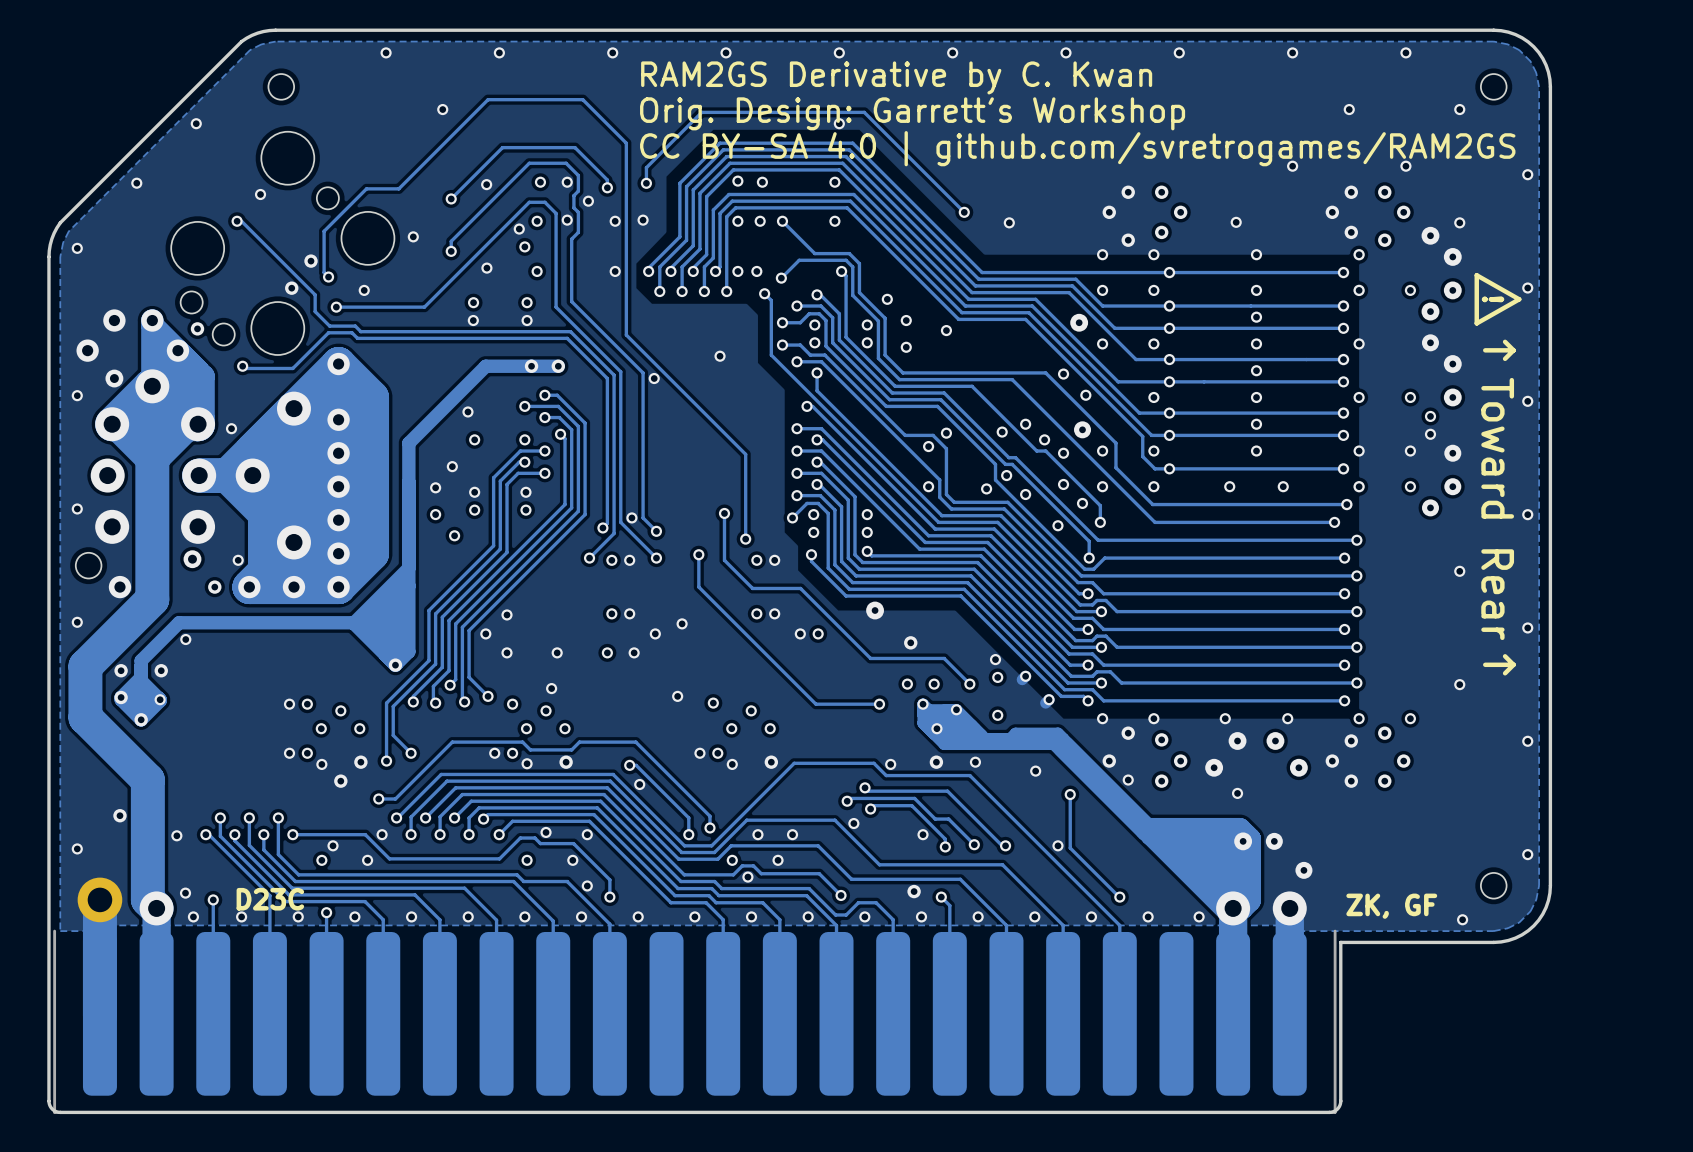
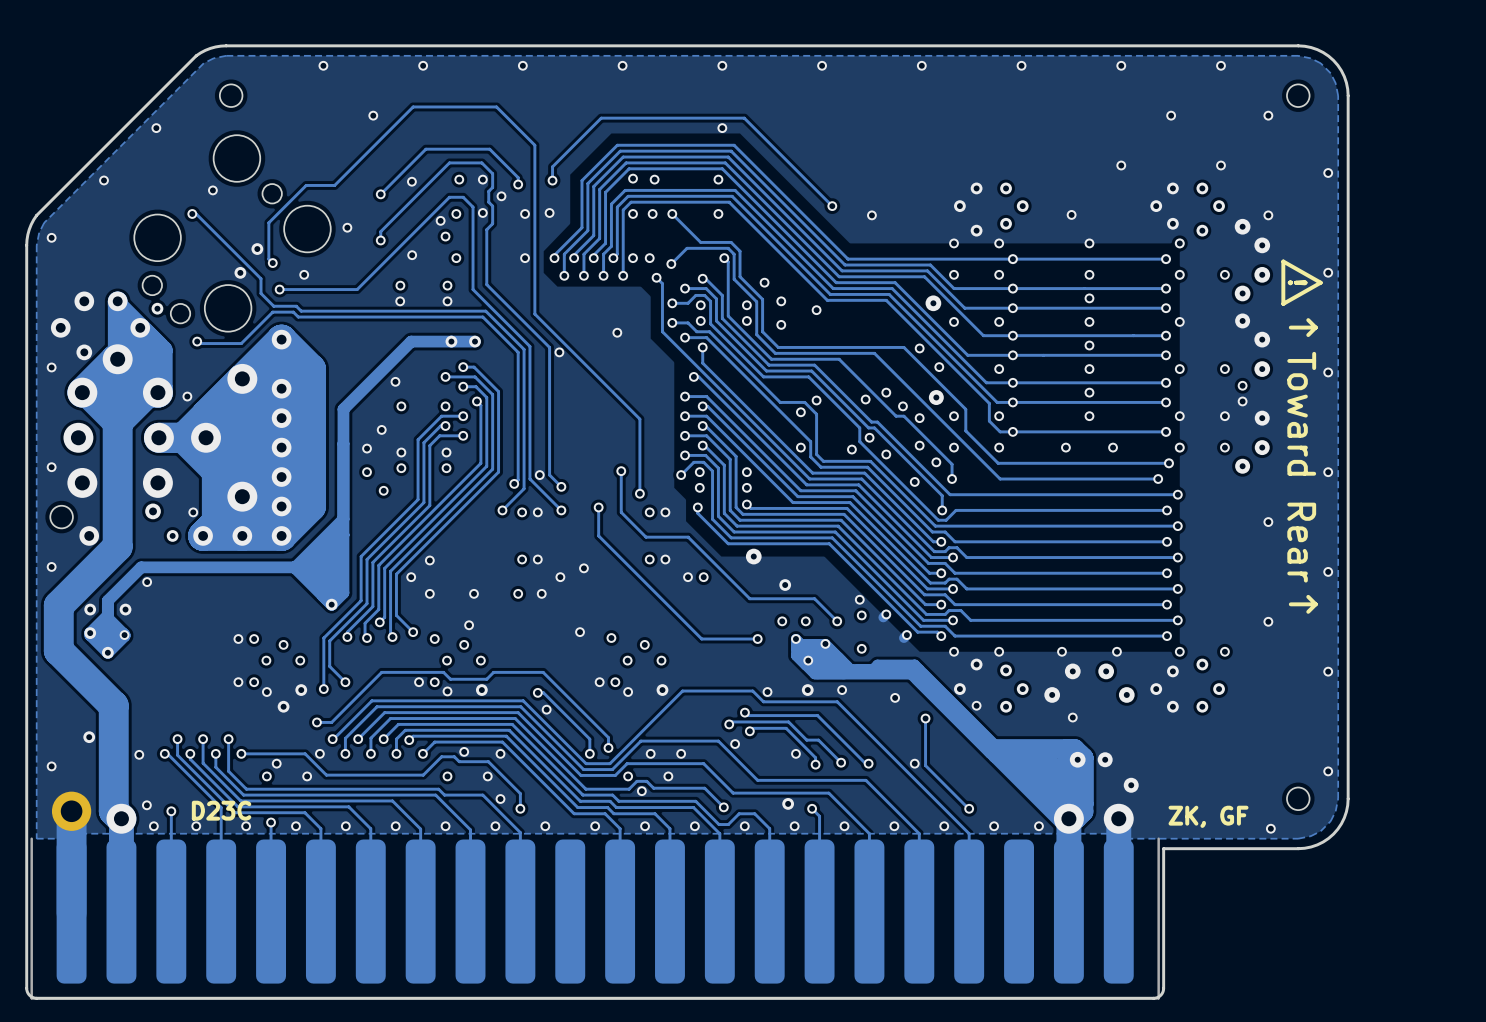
text: RAM2GS Derivative by C. Kwan (896, 77) -> none
text: Orig. Design: Garrett's Workshop (912, 113) -> none
text: CC BY-SA 4.0 | github.com/svretrogames/RAM2GS (1077, 148) -> none

